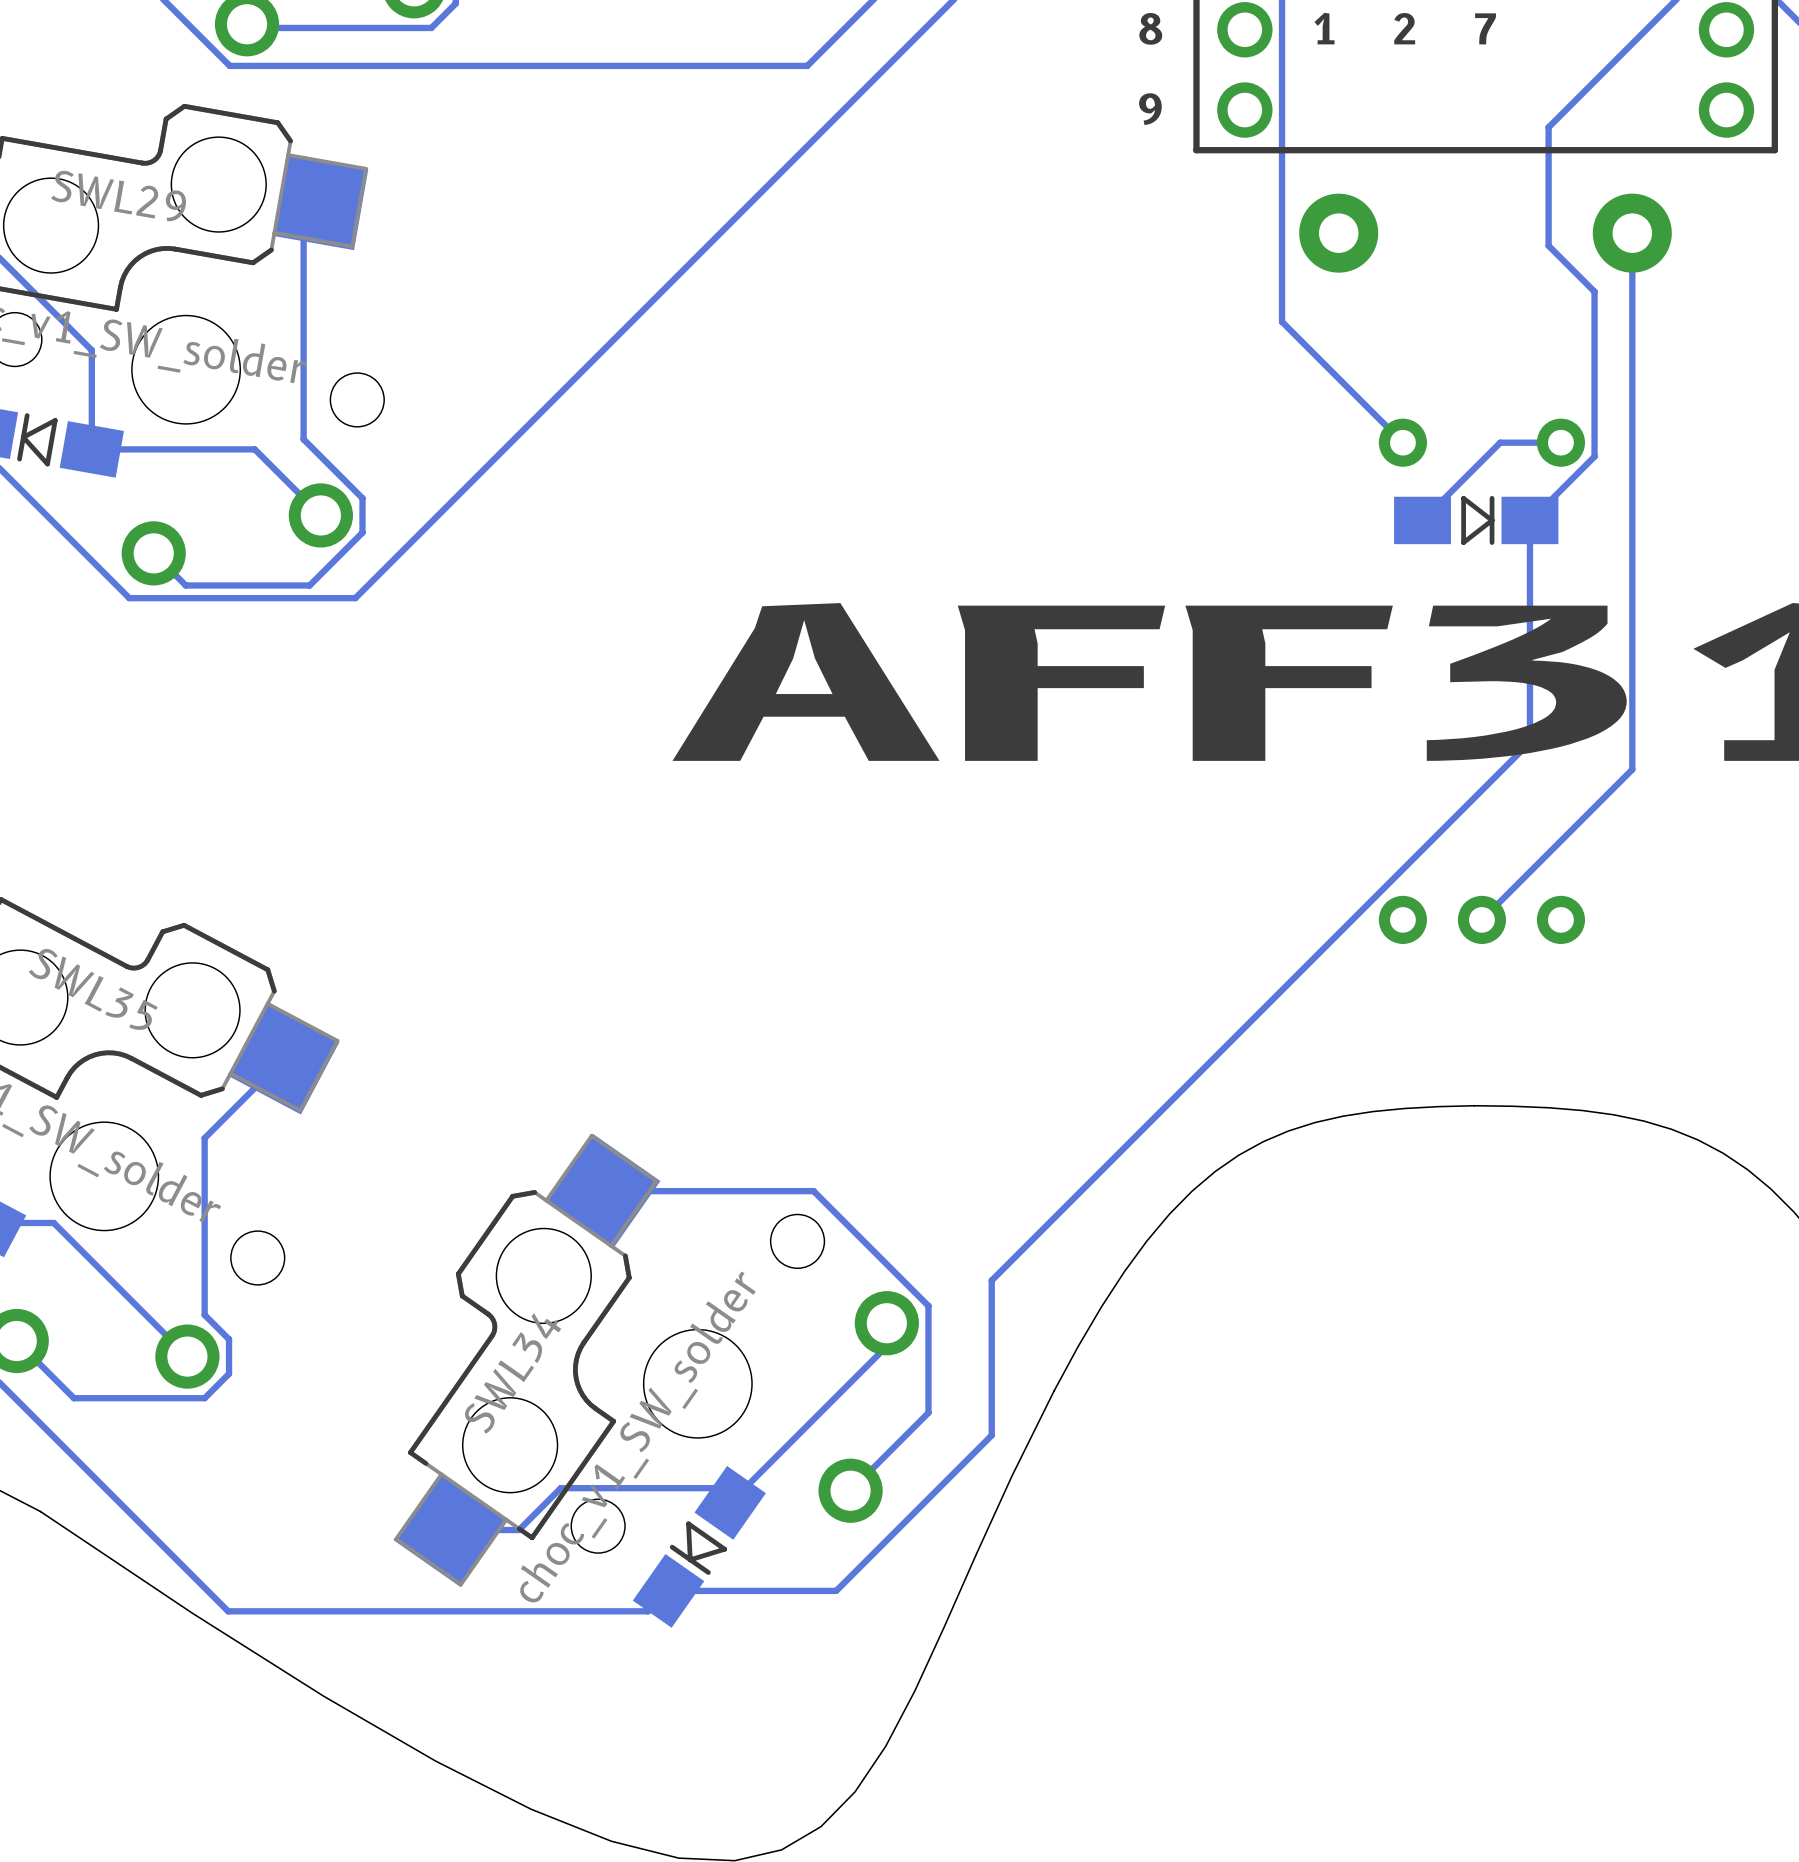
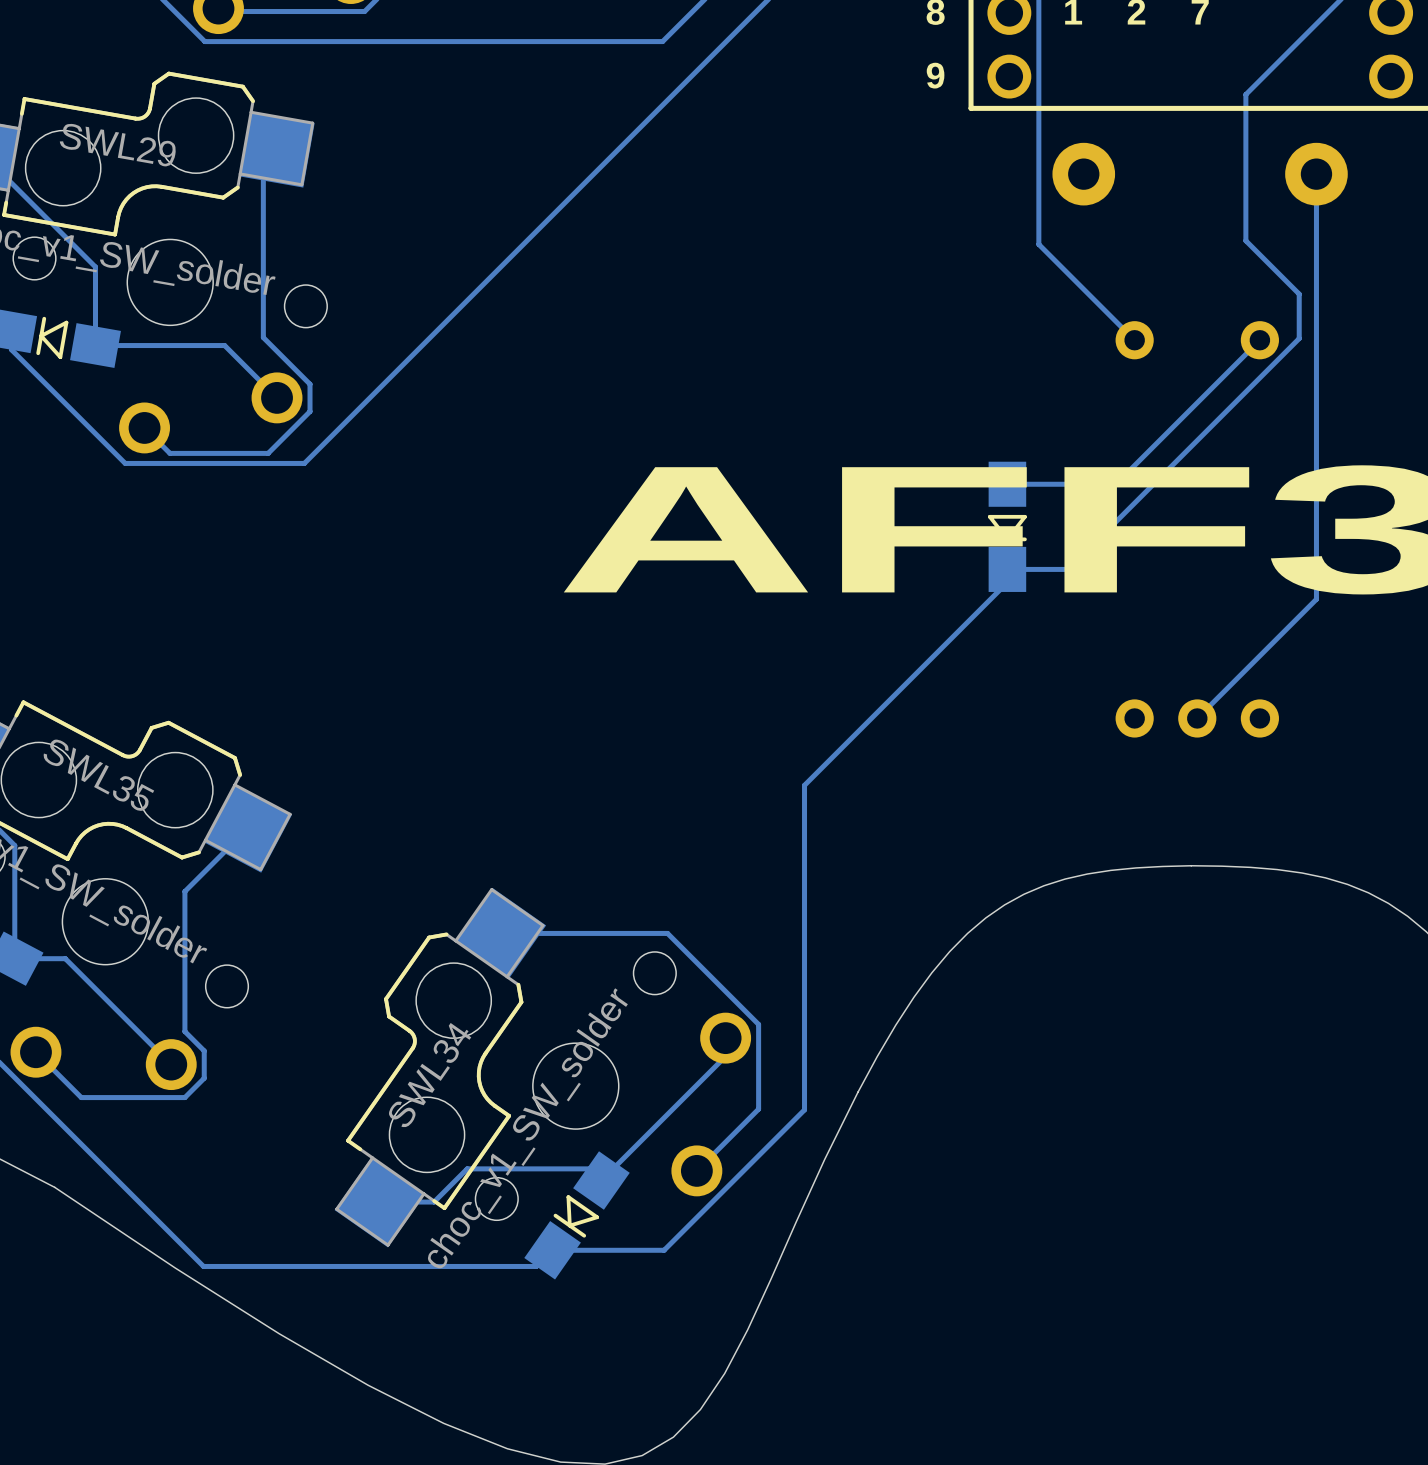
track: (1548, 127) (1548, 245) (1594, 291) (1594, 456) -> (1250, 90) (1245, 94) (1245, 240) (1299, 294) (1299, 338) (1286, 351)
track: (1560, 442) (1500, 442) (1422, 520) -> (1259, 340) (1115, 484) (1007, 484)
part rotation: 0° (1476, 520) -> 90° clockwise (1007, 526)
part position: (1476, 520) -> (1007, 526)
track: (1530, 520) (1529, 742) (991, 1280) (991, 1435) (836, 1590) (809, 1590) -> (1235, 401) (1068, 569) (1007, 569) (1007, 582) (804, 785) (804, 1109) (664, 1250)

